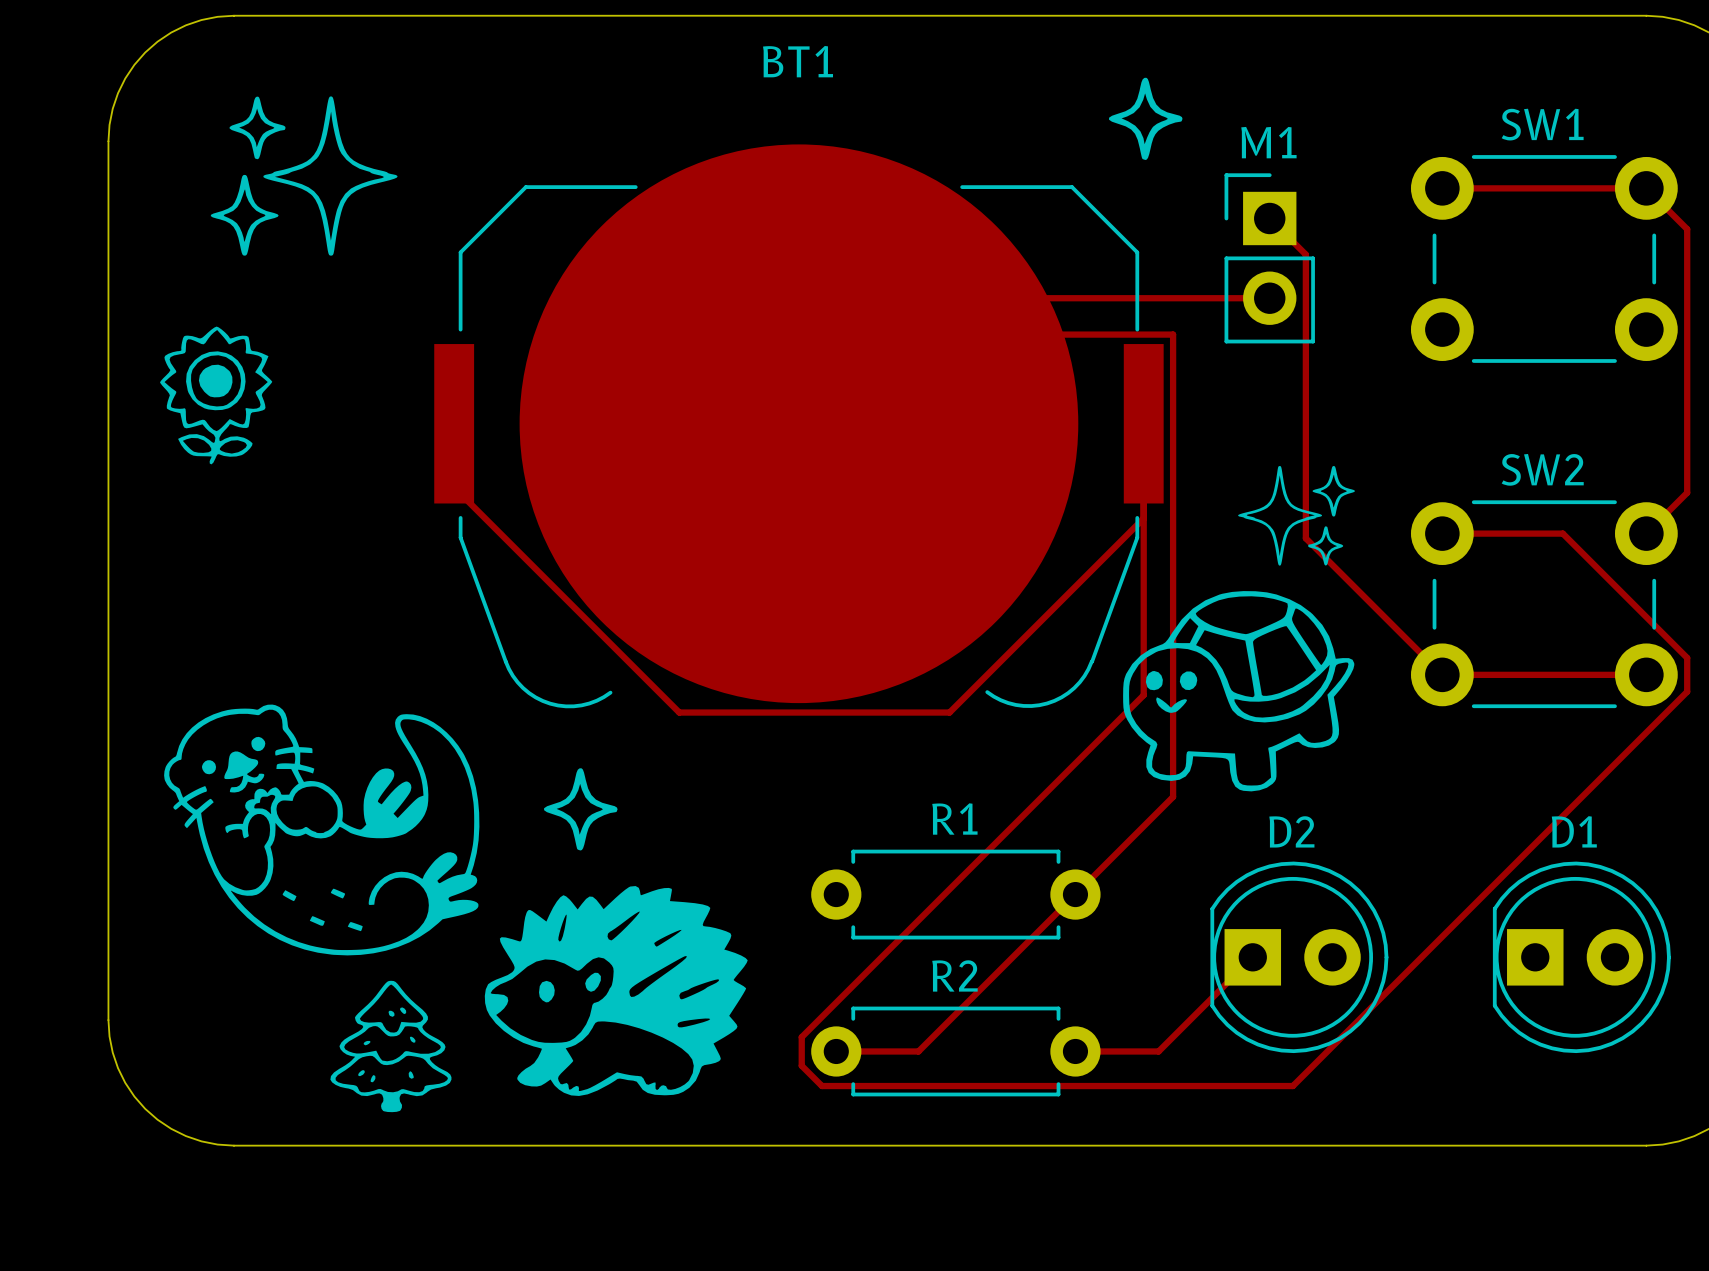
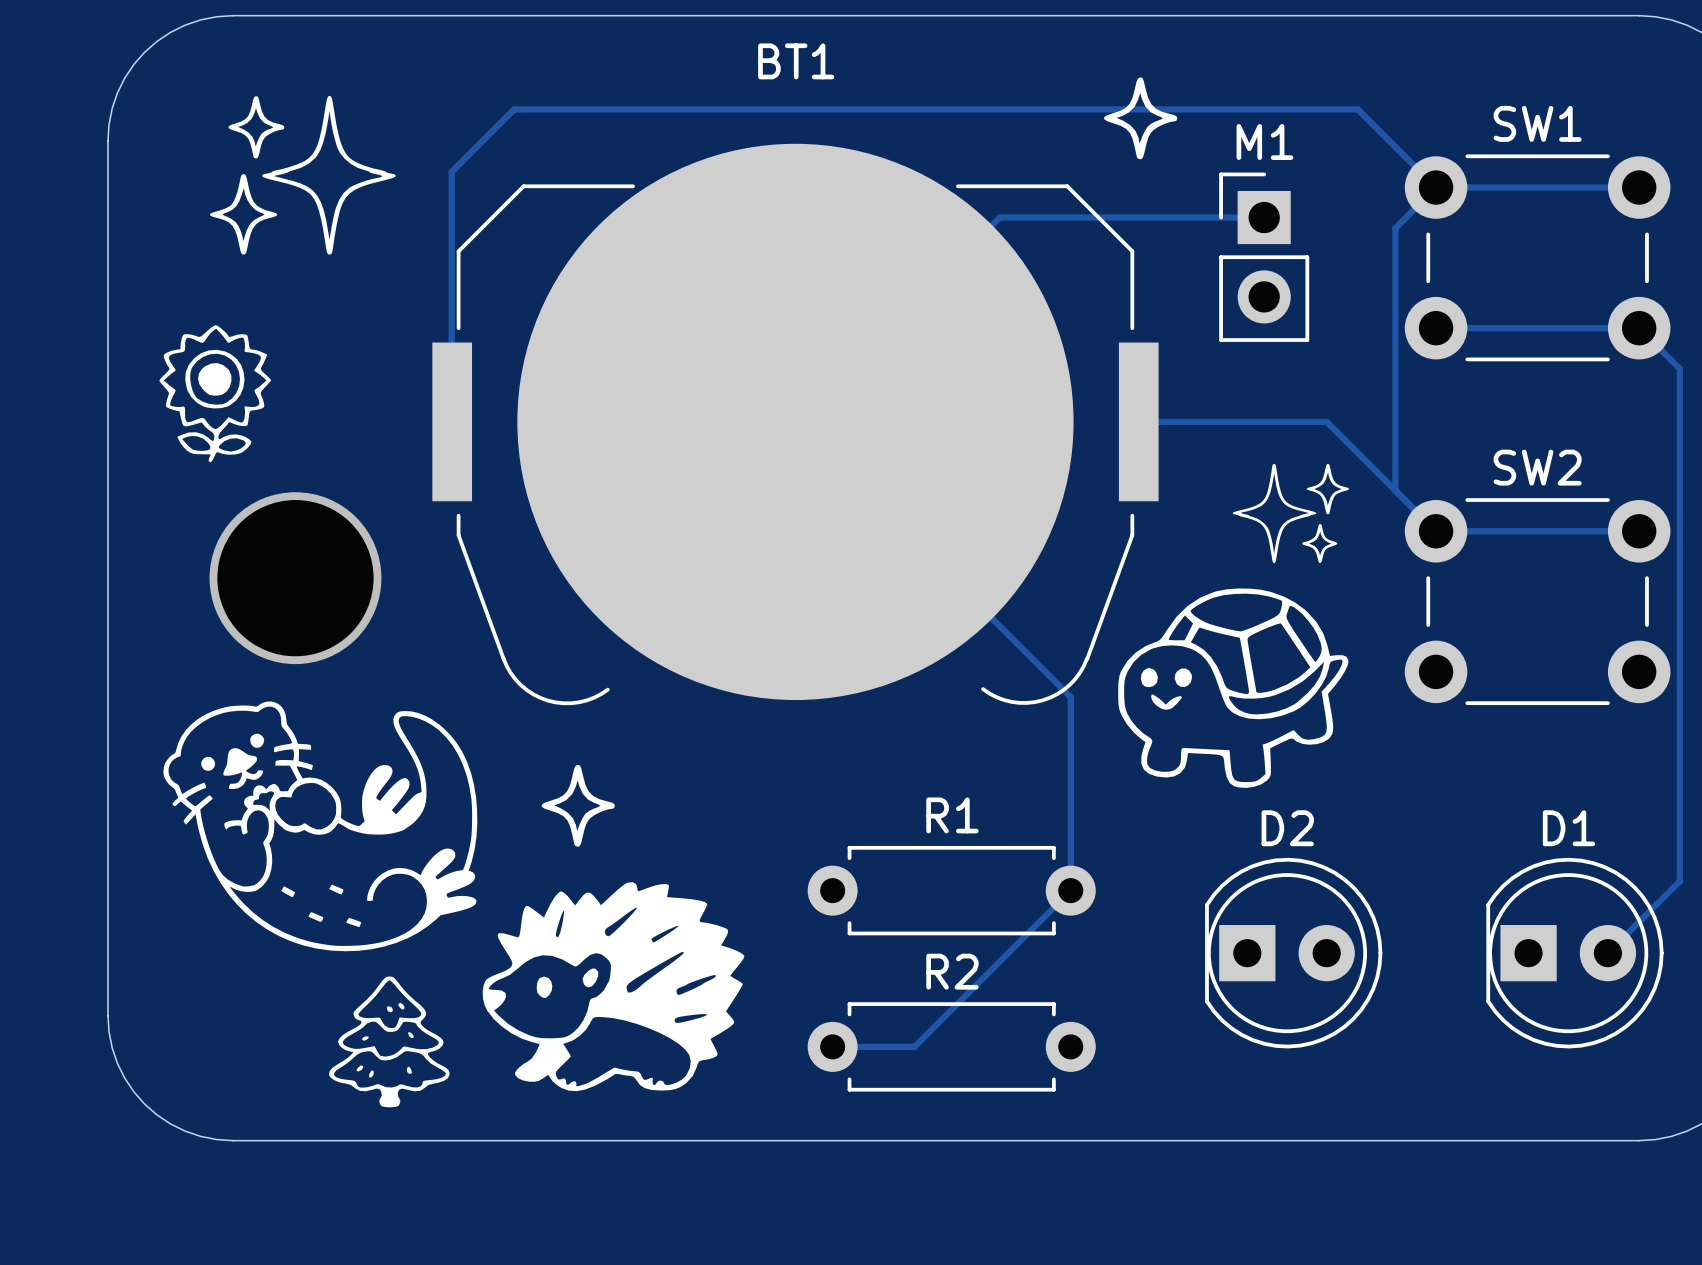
track: (1646, 188) (1687, 229) (1687, 370) -> (1436, 328) (1639, 328) (1679, 368)
track: (1269, 218) (1305, 254) (1305, 538) (1442, 674) (1646, 674) -> none
track: (924, 298) (1269, 298) -> (920, 296) (999, 217) (1264, 217)
track: (888, 334) (1173, 334) (1173, 796) (1075, 894) -> (795, 421) (1070, 697) (1070, 890)
track: (454, 423) (454, 487) (679, 712) (949, 712) (1143, 518) -> (452, 421) (451, 171) (514, 109) (1357, 109) (1436, 187) (1395, 228) (1395, 490)
track: (1143, 423) (1143, 695) (801, 1037) (801, 1065) (821, 1086) (1292, 1086) (1687, 691) -> (1138, 421) (1326, 421) (1436, 531)
track: (1687, 492) (1646, 533) -> (1679, 490) (1679, 655)
track: (1562, 533) (1687, 657) -> (1556, 531) (1639, 531)
via: none -> (295, 578)
track: none -> (1679, 688) (1679, 881) (1607, 953)
track: (1252, 957) (1158, 1051) (1075, 1051) -> none

